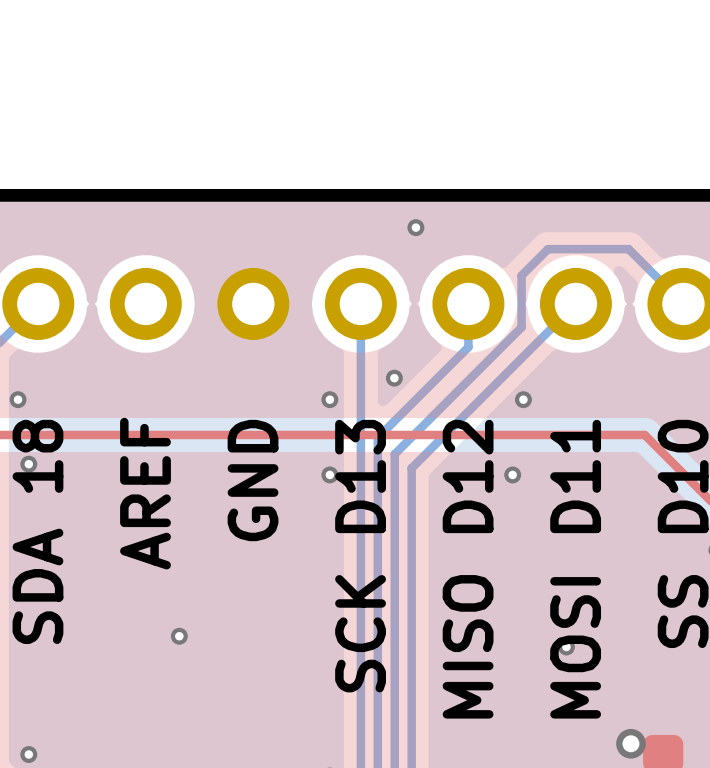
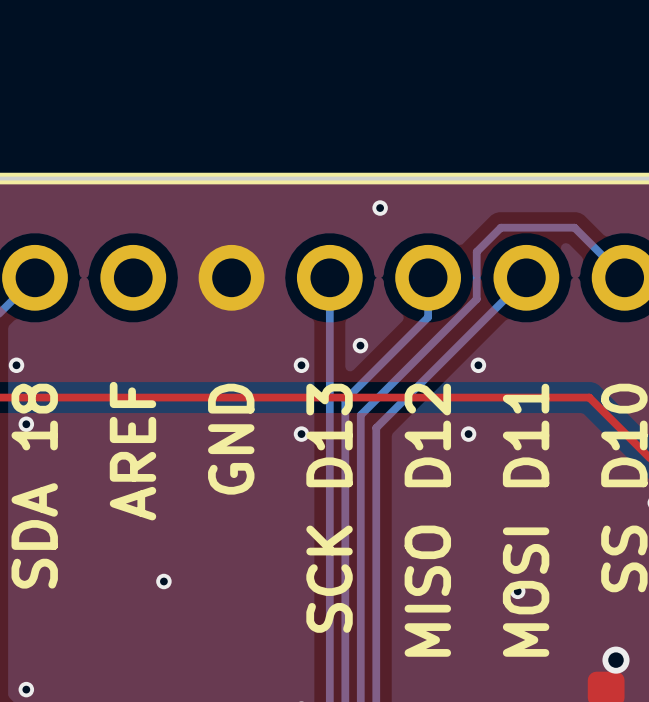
via: none -> (615, 660)
via: (630, 743) -> none

